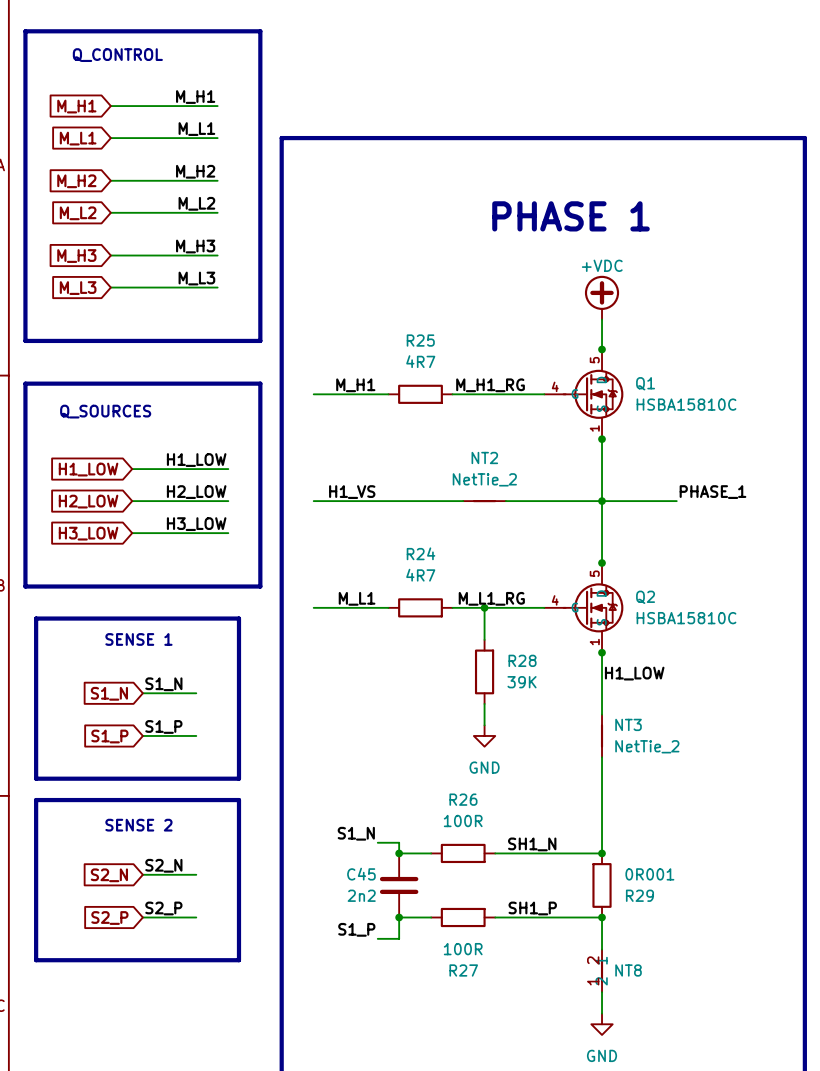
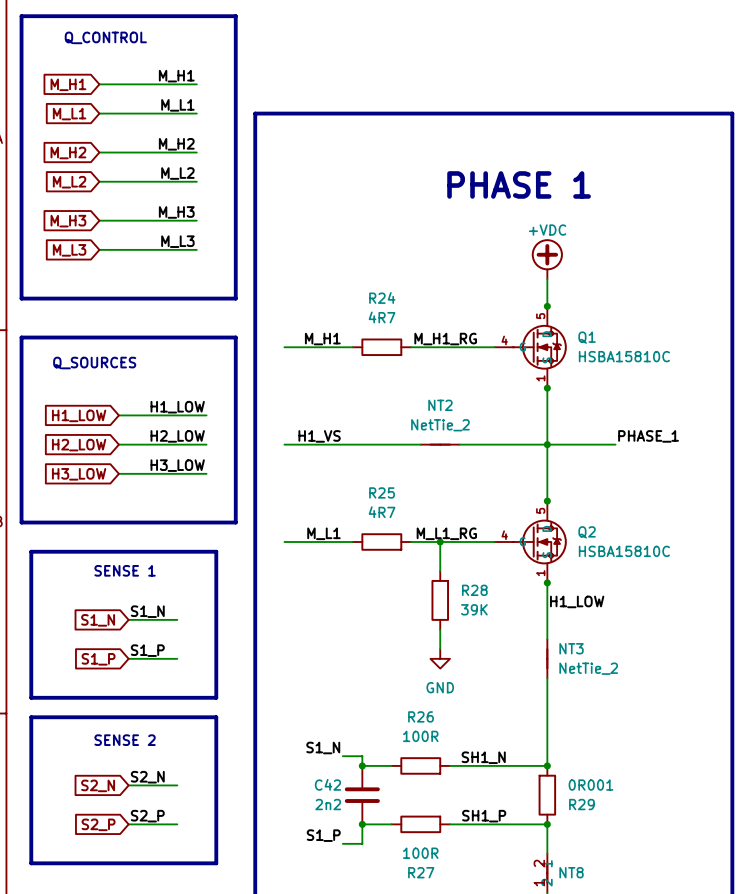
R25 name: R25 (420, 340) -> R24 (382, 297)
R24 name: R24 (421, 553) -> R25 (382, 492)
C45 name: C45 (361, 874) -> C42 (327, 784)

